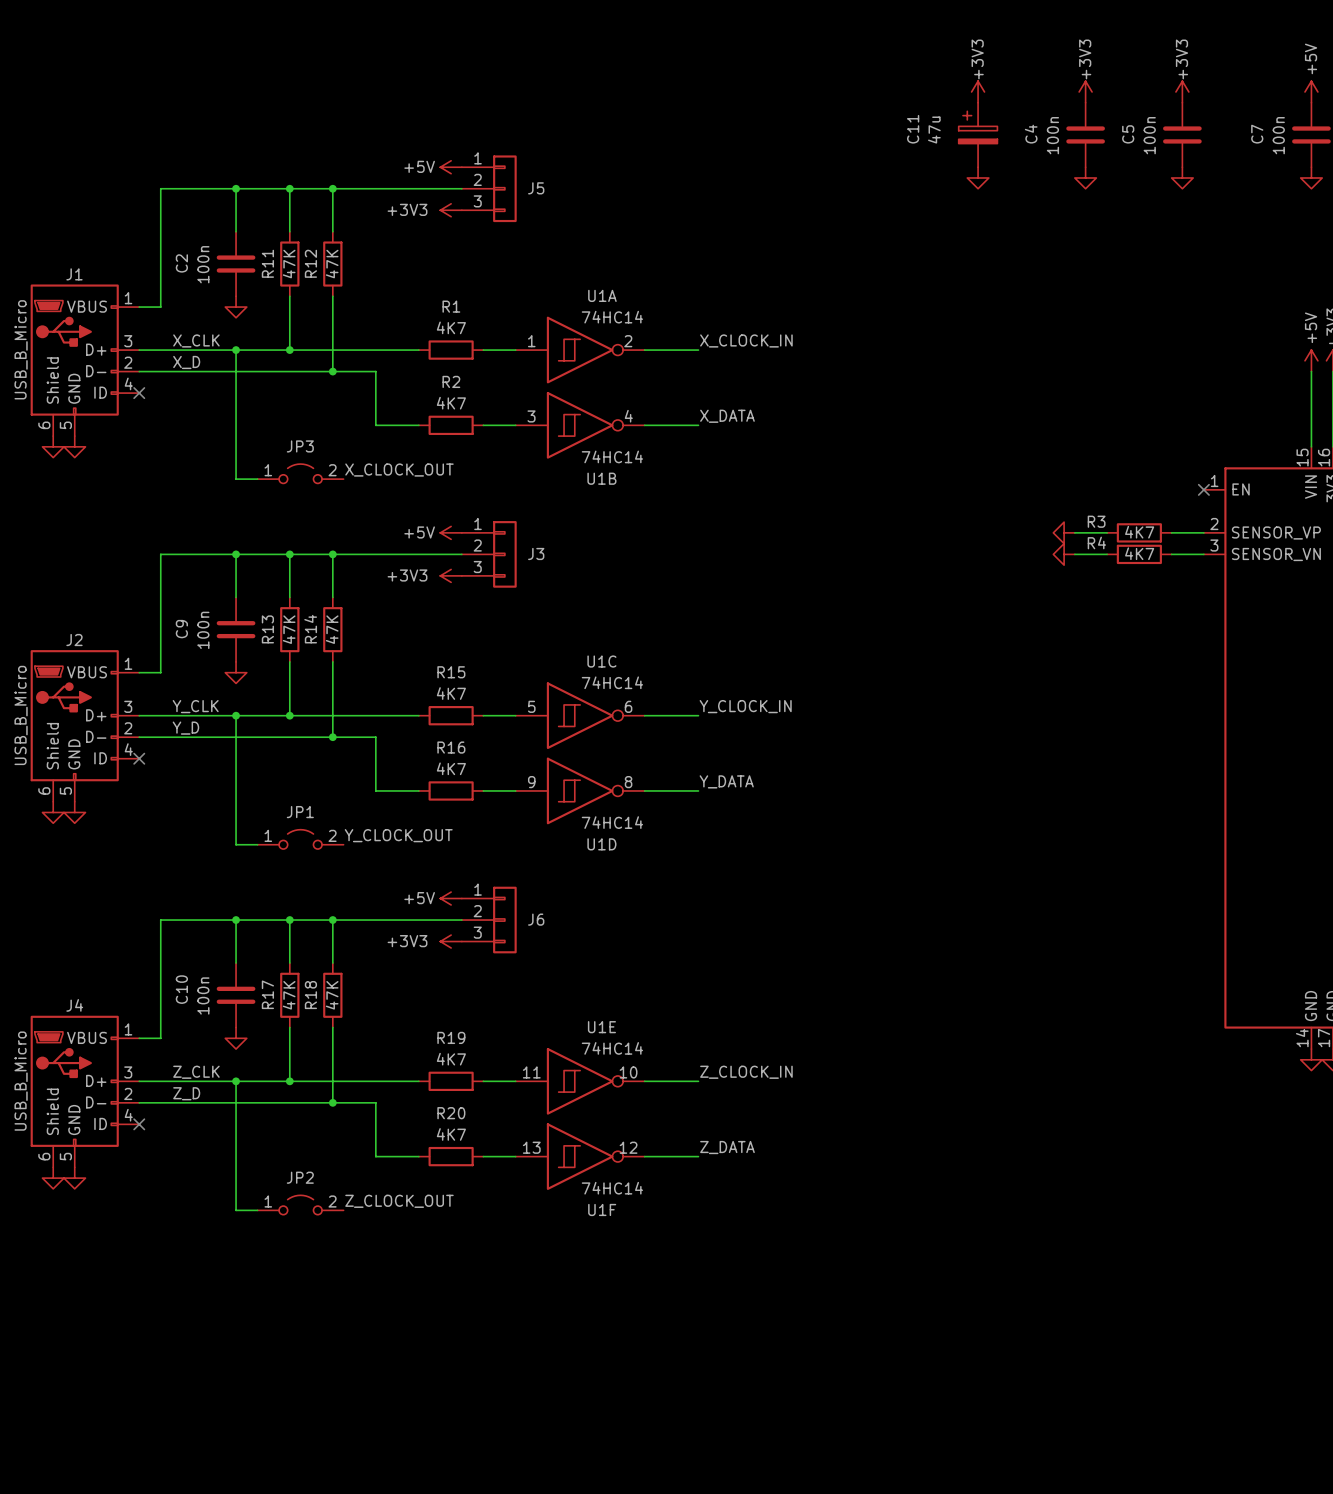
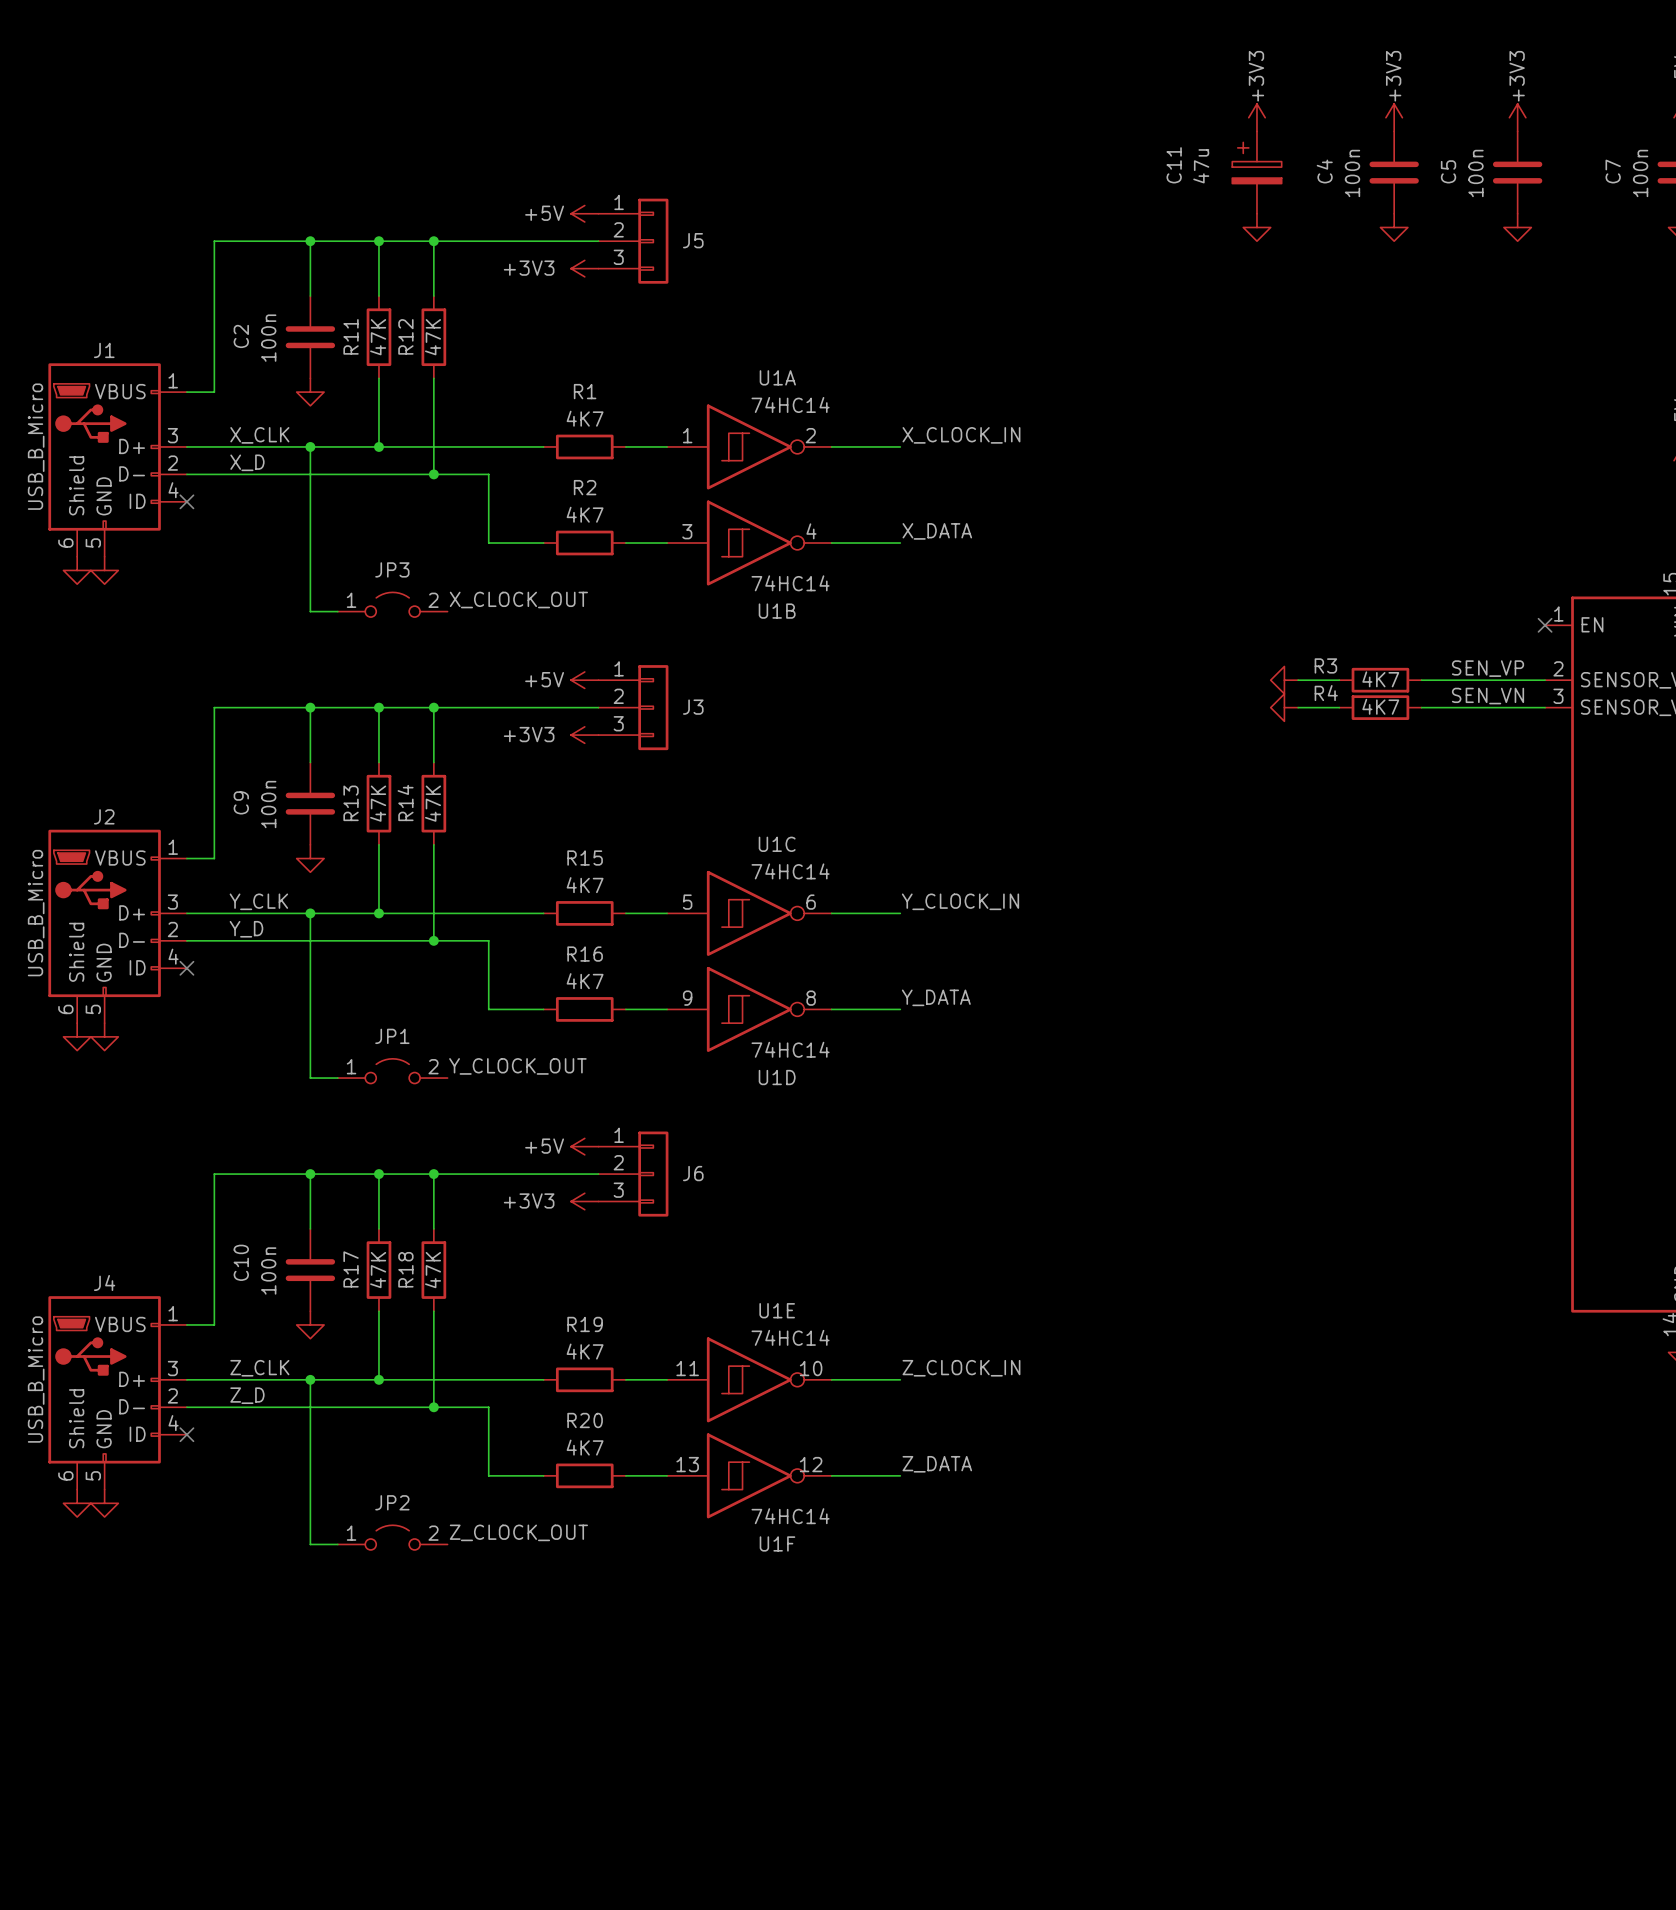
label: none -> SEN_VP (1488, 668)
power symbol: none -> (1284, 680)
wire: none -> (1298, 680) (1339, 680)
power symbol: (1064, 532) -> none
wire: (1074, 532) (1107, 532) -> (1503, 680) (1421, 680)
R3 position: (1139, 532) -> (1380, 680)
label: none -> SEN_VN (1488, 696)
power symbol: none -> (1284, 707)
wire: none -> (1298, 707) (1339, 707)
power symbol: (1064, 554) -> none
wire: (1074, 554) (1107, 554) -> (1503, 707) (1421, 707)
R4 position: (1139, 554) -> (1380, 707)

